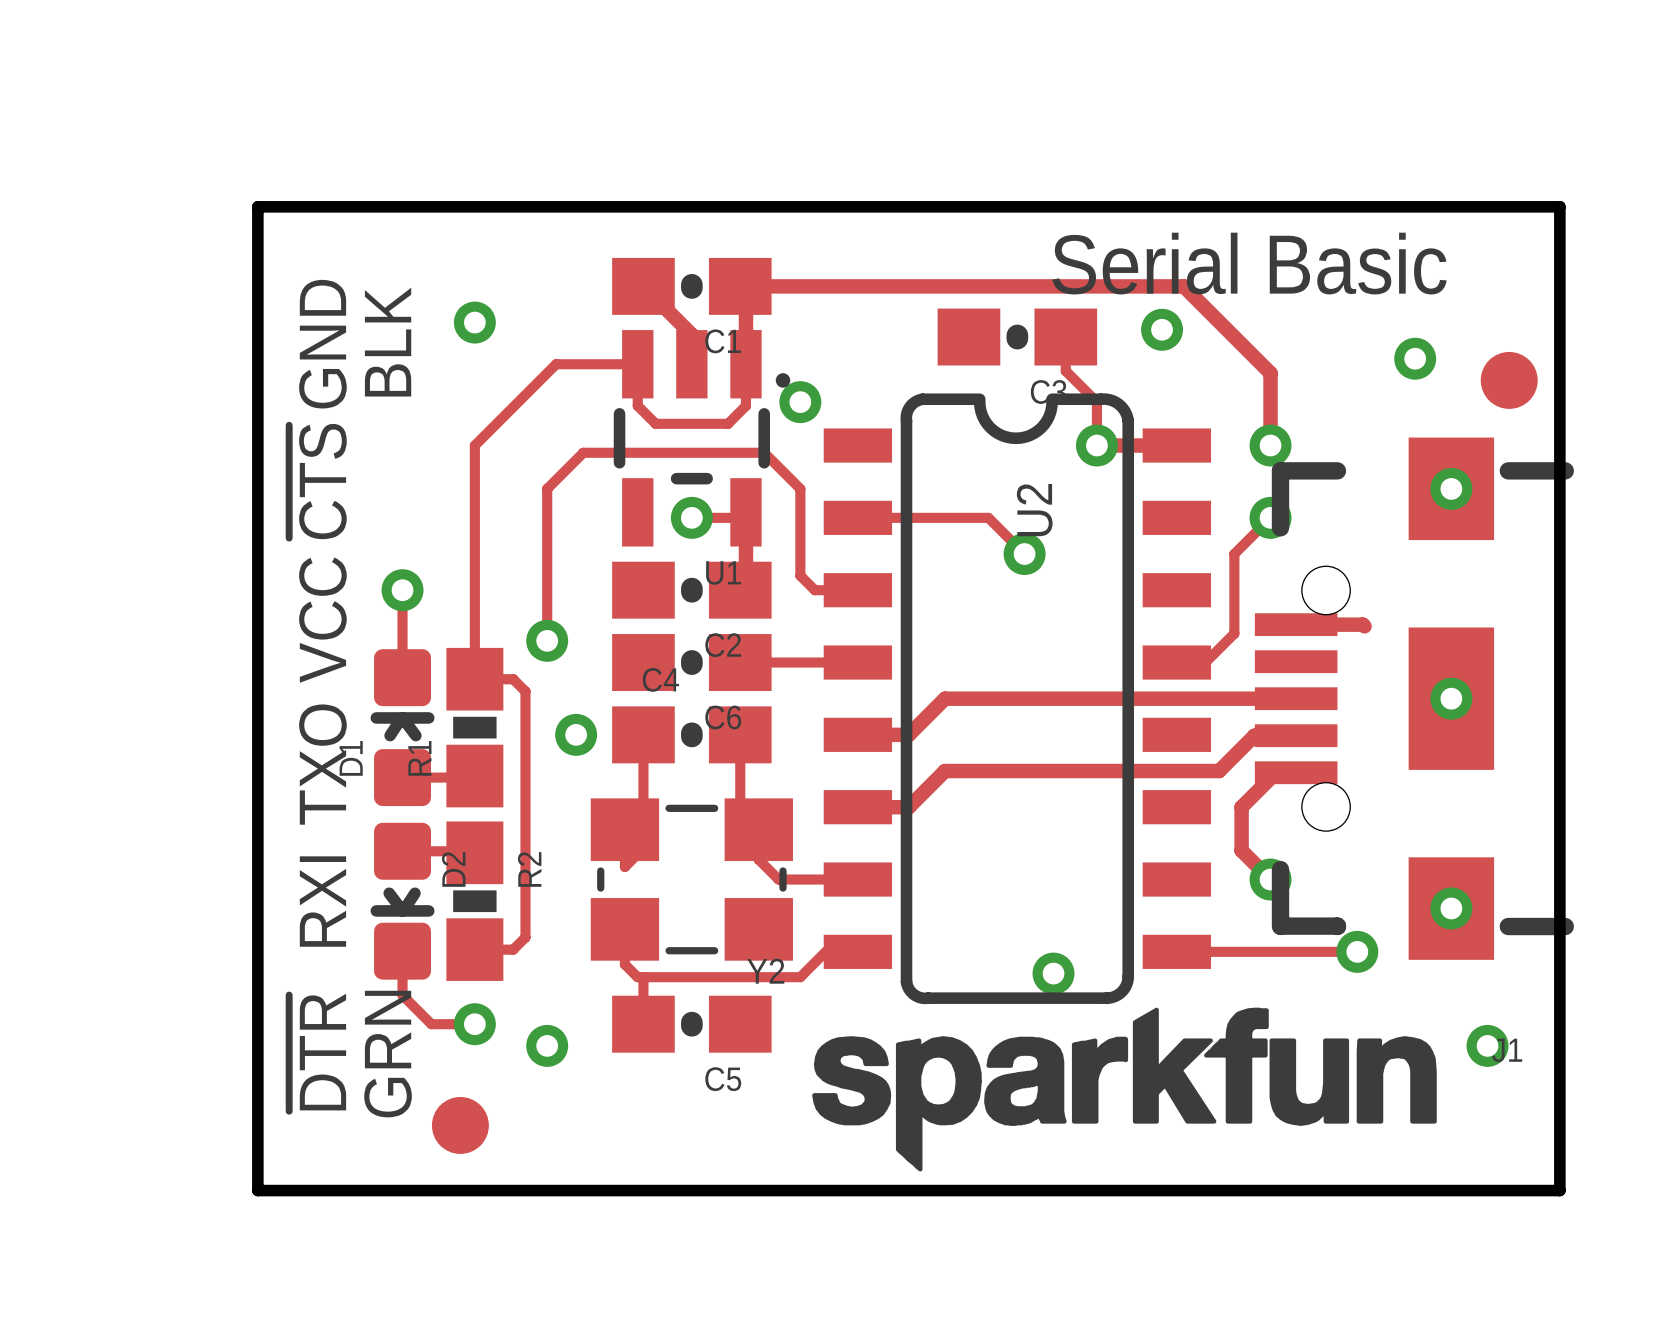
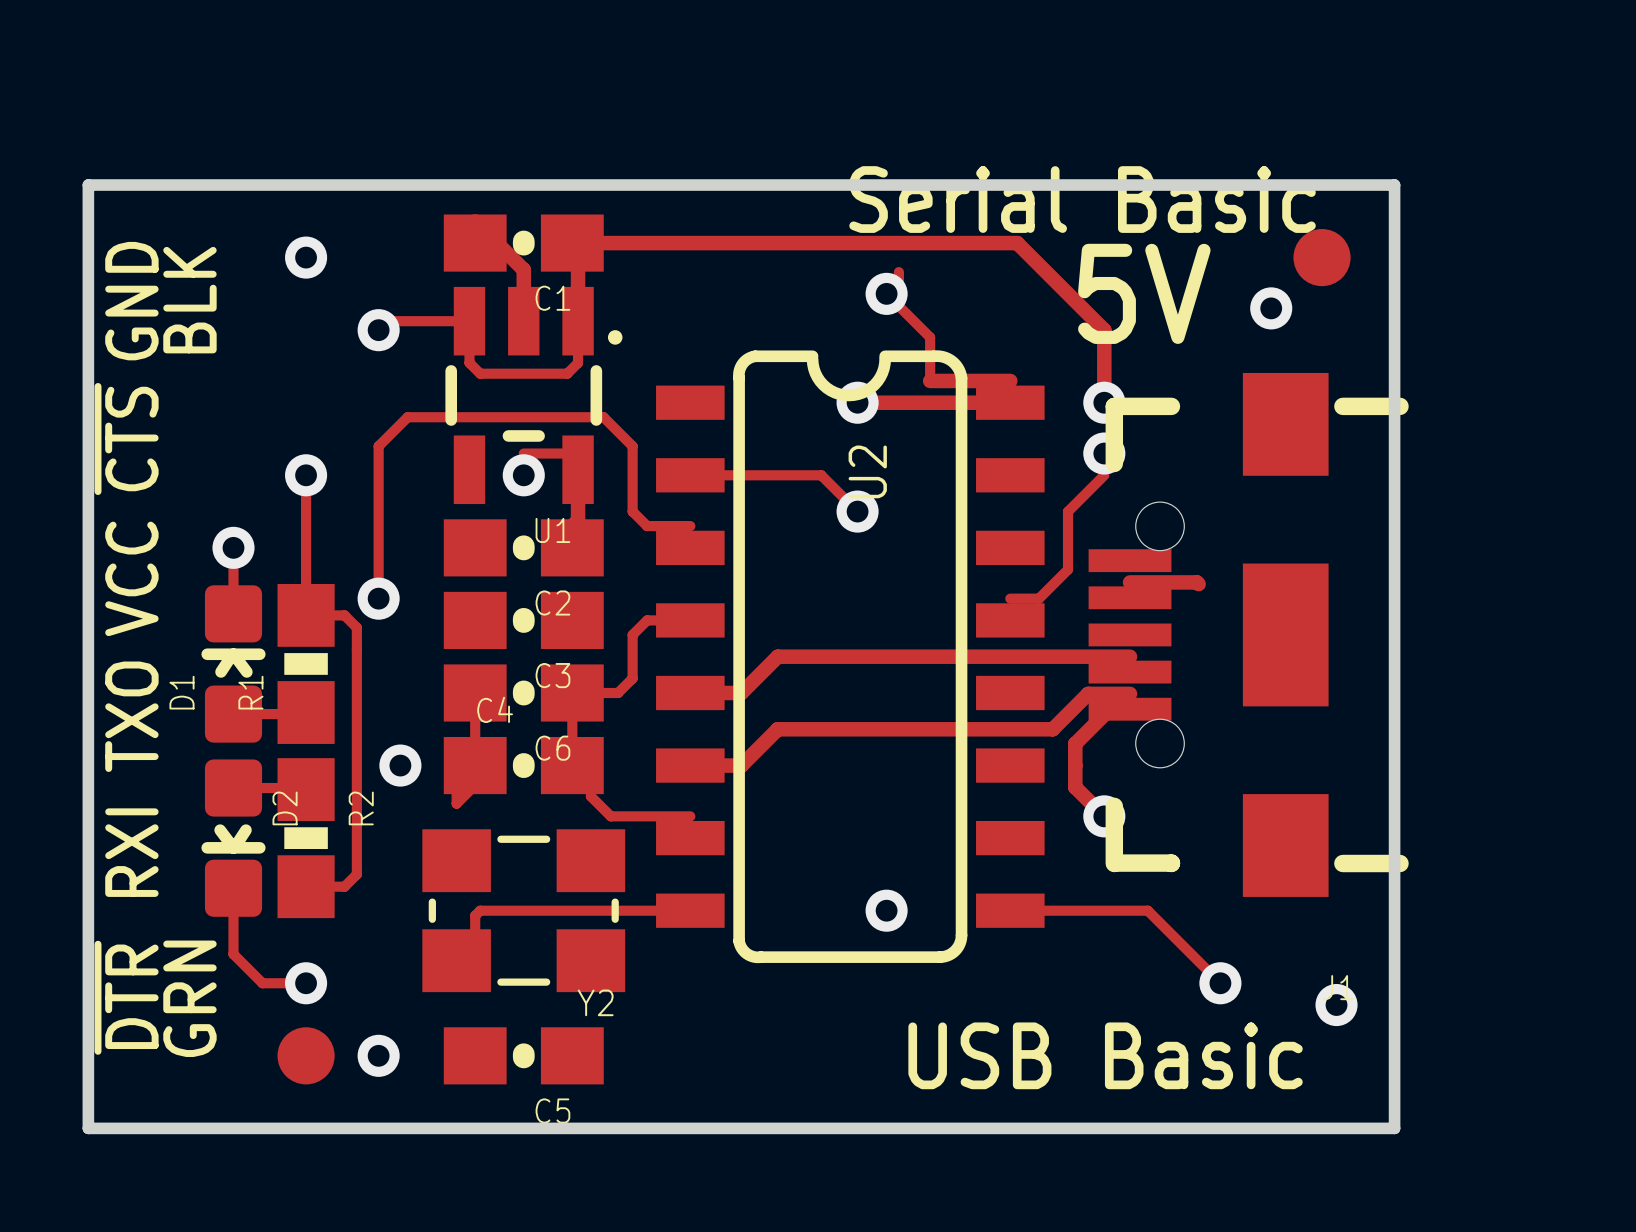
board edge: (257, 250) (257, 206) (1559, 206) (1559, 250) -> (88, 185) (1394, 185)
C1 position: (691, 286) -> (523, 243)
track: (745, 313) (745, 292) (740, 286) (1183, 286) (1270, 373) (1270, 394) -> (578, 248) (572, 243) (1017, 243) (1104, 330)
via: (1162, 329) -> none
C3 position: (1017, 337) -> (523, 620)
text position: BLK (388, 342) -> BLK (189, 300)
text position: GND (322, 344) -> GND (131, 301)
via: none -> (886, 293)
via position: (1415, 358) -> (1271, 308)
text: none -> 5V (1144, 293)
part position: (1509, 380) -> (1322, 257)
track: (637, 385) (637, 364) (556, 364) (474, 445) (474, 539) -> (469, 321) (387, 321) (378, 330)
via: none -> (378, 330)
via: (800, 402) -> none
track: (637, 405) (655, 423) (728, 423) (745, 405) -> (469, 341) (469, 362) (480, 373) (567, 373) (578, 362) (578, 341)
U1 position: (701, 438) -> (533, 395)
via: (1096, 445) -> none
via position: (1270, 445) -> (1104, 402)
track: none -> (857, 402) (1010, 402)
via: none -> (857, 402)
text position: ~{CTS} (317, 481) -> ~{CTS} (126, 439)
via: (1451, 488) -> none
track: (547, 510) (547, 488) (583, 452) (764, 452) (800, 488) (800, 510) -> (378, 446) (407, 417) (603, 417) (632, 446)
via position: (691, 517) -> (523, 475)
track: (857, 517) (988, 517) (1024, 554) -> (690, 475) (821, 475) (857, 511)
track: (1270, 517) (1234, 554) (1234, 575) -> (1104, 475) (1068, 511)
via: none -> (306, 475)
via position: (1024, 554) -> (857, 511)
via position: (402, 590) -> (233, 547)
C2 position: (691, 590) -> (523, 547)
text position: VCC (322, 620) -> VCC (131, 578)
track: (1296, 624) (1362, 624) (1364, 626) -> (1130, 582) (1196, 582) (1198, 584)
via position: (547, 640) -> (378, 598)
C6 position: (691, 662) -> (523, 692)
track: (740, 662) (857, 662) -> none
track: none -> (690, 620) (647, 620) (632, 634) (632, 678) (618, 692) (572, 692)
U2 position: (1017, 698) -> (850, 656)
track: (1296, 698) (945, 698) (908, 734) (857, 734) -> (1130, 656) (777, 656) (741, 692) (690, 692)
via: (1451, 698) -> none
via: (576, 734) -> none
C4 position: (691, 734) -> (523, 765)
track: (1296, 735) (1254, 735) (1219, 771) (945, 771) (908, 807) (857, 807) -> (1130, 693) (1088, 693) (1052, 729) (777, 729) (741, 765) (690, 765)
text position: TXO (322, 764) -> TXO (131, 716)
via: none -> (400, 765)
Y2 position: (691, 879) -> (523, 910)
text position: RXI (322, 901) -> RXI (131, 852)
via: (1451, 908) -> none
track: (624, 929) (624, 964) (637, 977) (800, 977) (825, 951) (857, 951) -> none
track: (1176, 951) (1357, 951) -> none
via: (1357, 951) -> none
track: none -> (690, 910) (480, 910) (476, 914)
track: none -> (1010, 910) (1147, 910) (1220, 983)
track: (402, 995) (431, 1024) (474, 1024) -> (233, 932) (233, 954) (262, 983) (306, 983)
drawing: [812, 1007, 1437, 1172] -> none
via position: (474, 1024) -> (306, 983)
C5 position: (691, 1024) -> (523, 1055)
via: (547, 1045) -> none
via: none -> (1220, 983)
via position: (1487, 1045) -> (1336, 1005)
text position: ~{DTR} (317, 1052) -> ~{DTR} (126, 997)
text position: GRN (388, 1054) -> GRN (189, 998)
text: none -> USB Basic (1105, 1055)
via: none -> (378, 1055)
part position: (460, 1125) -> (306, 1055)

